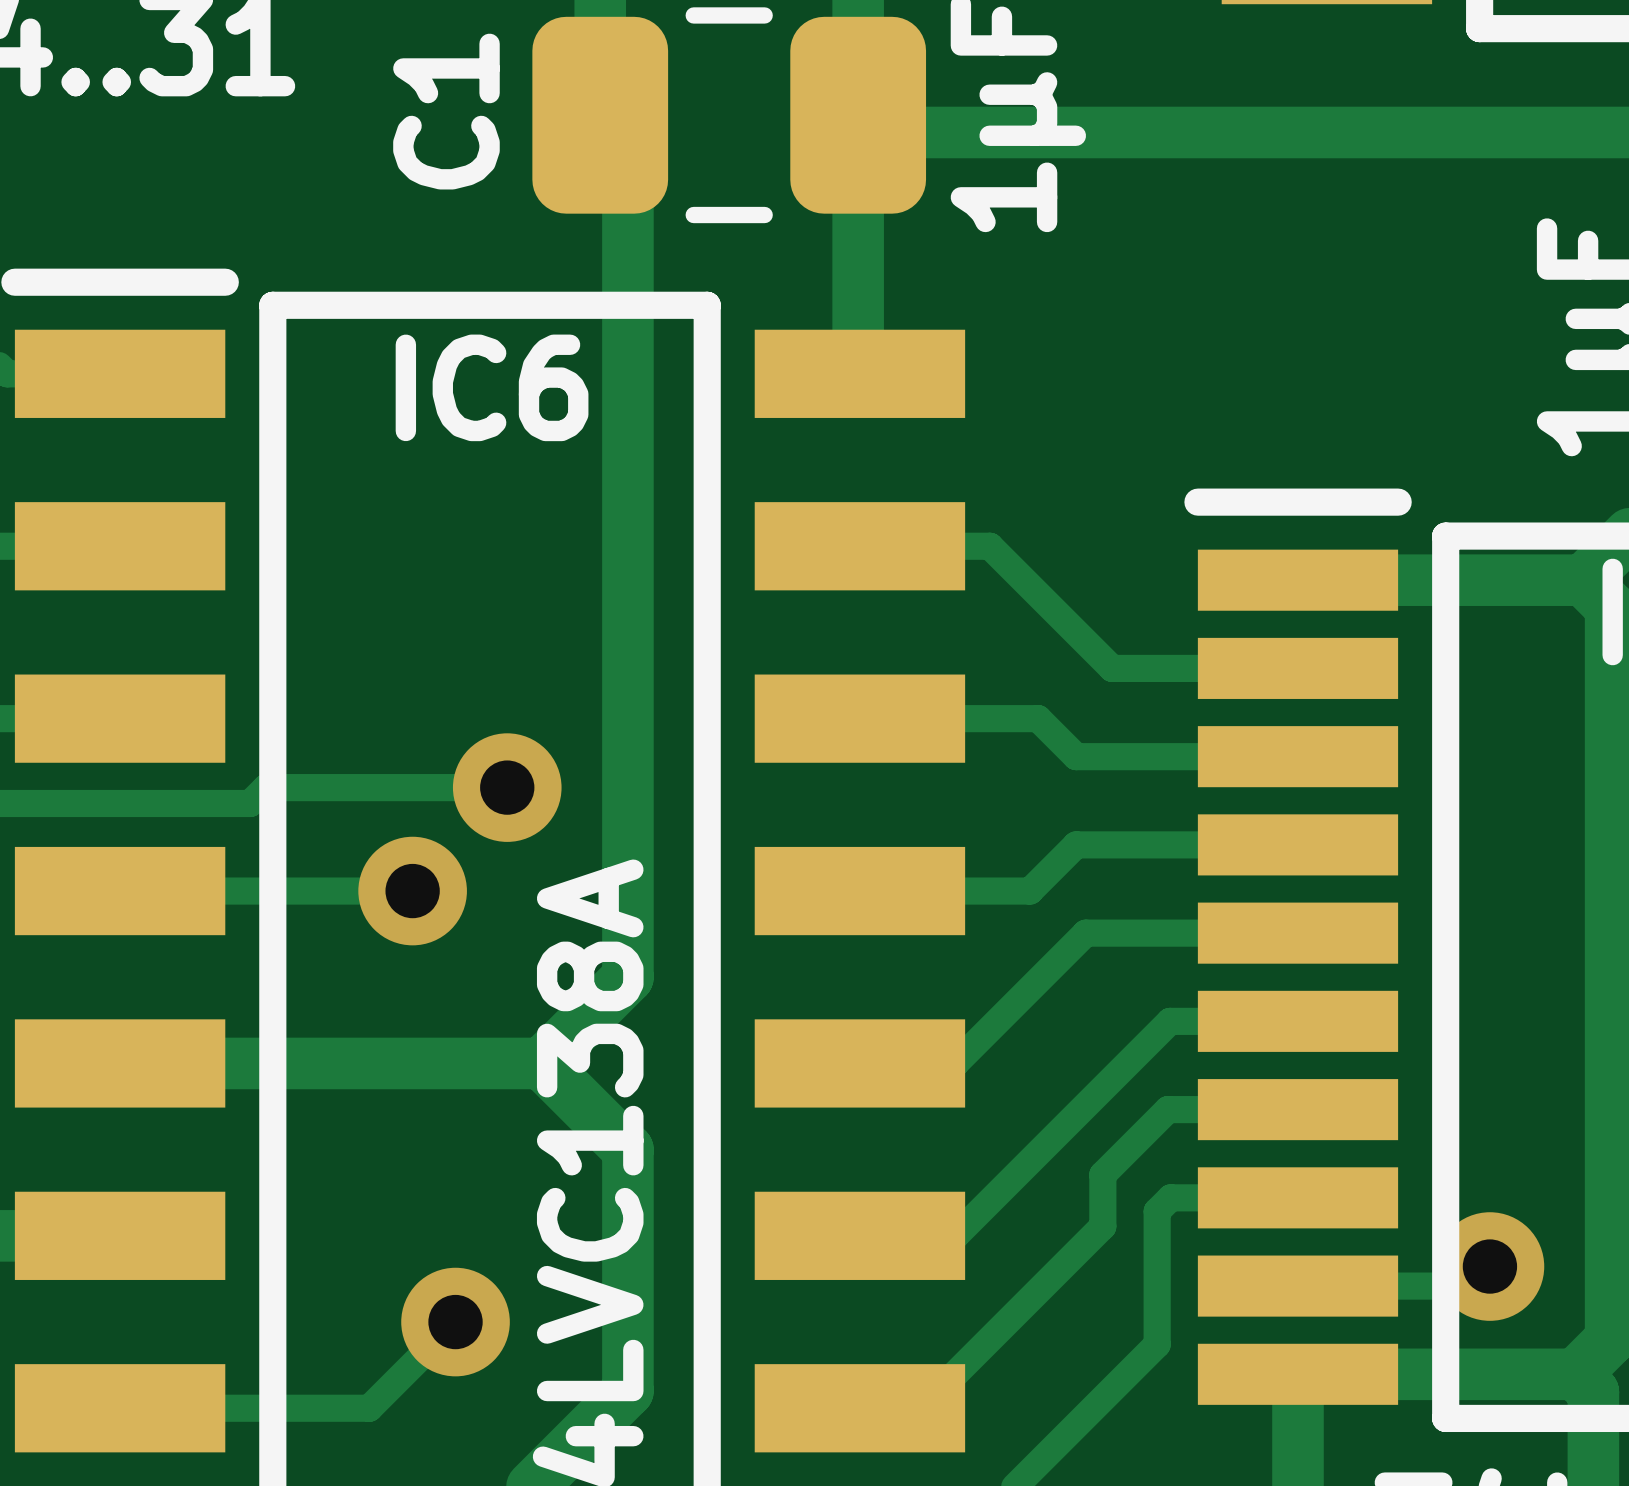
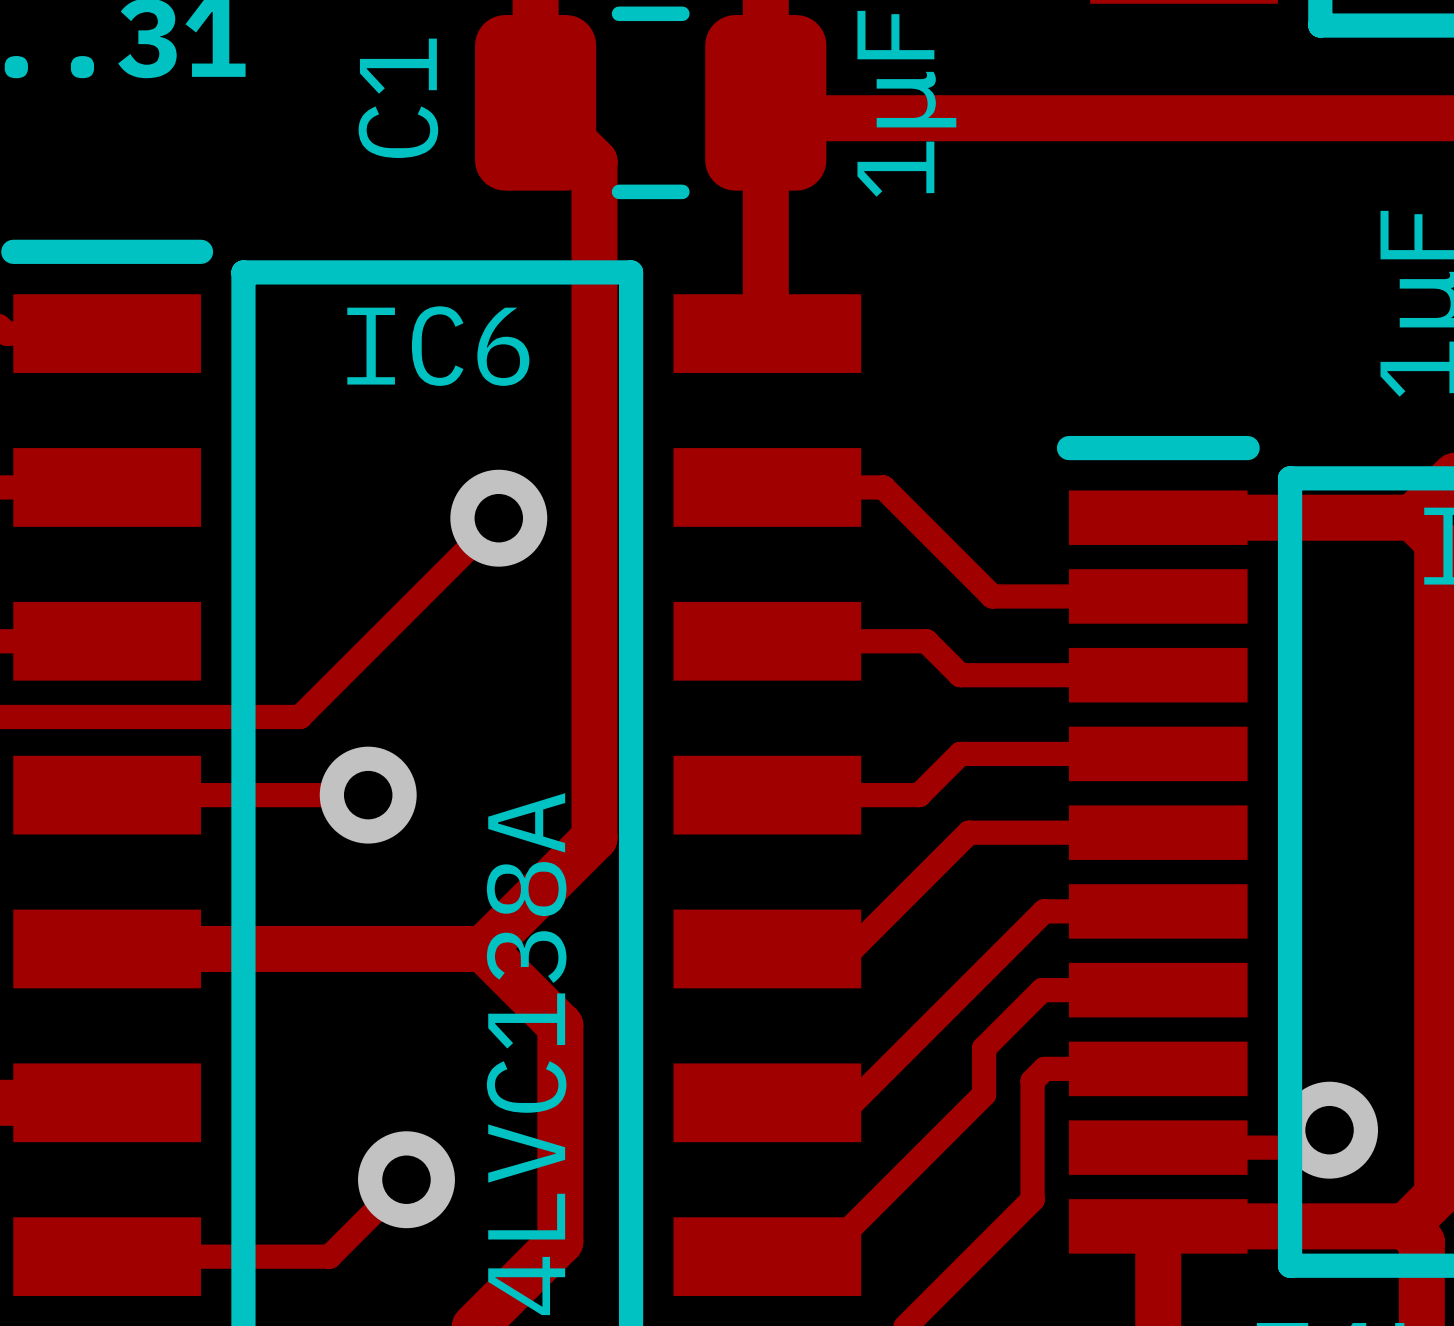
track: (627, 142) (627, 977) -> (560, 127) (594, 161) (594, 837) (560, 872)
track: (507, 787) (266, 787) (250, 803) -> (498, 518) (300, 716) (223, 716)
via position: (507, 787) -> (498, 518)

